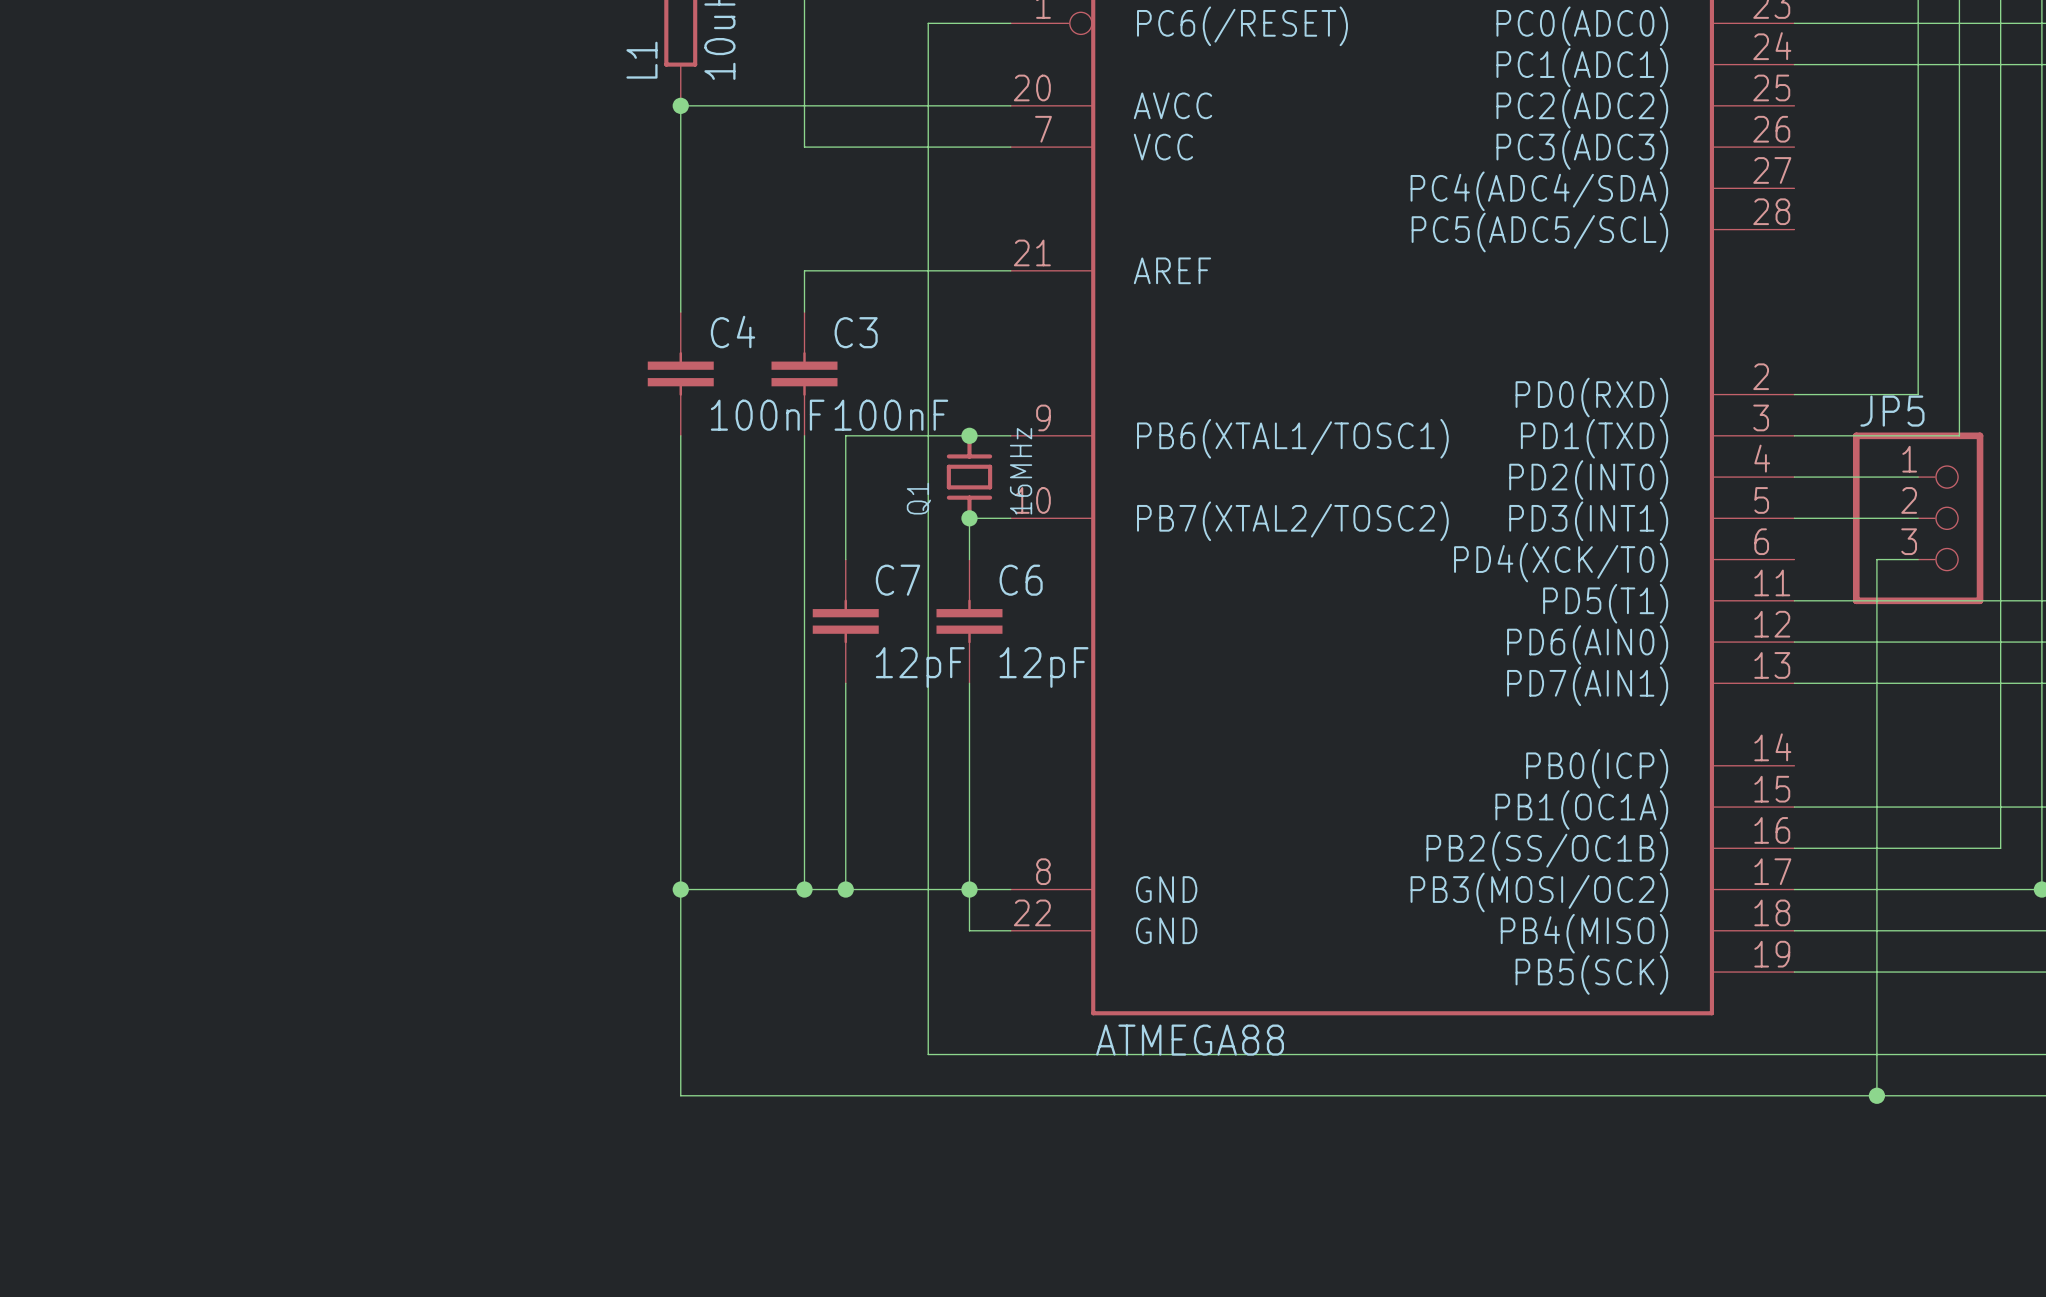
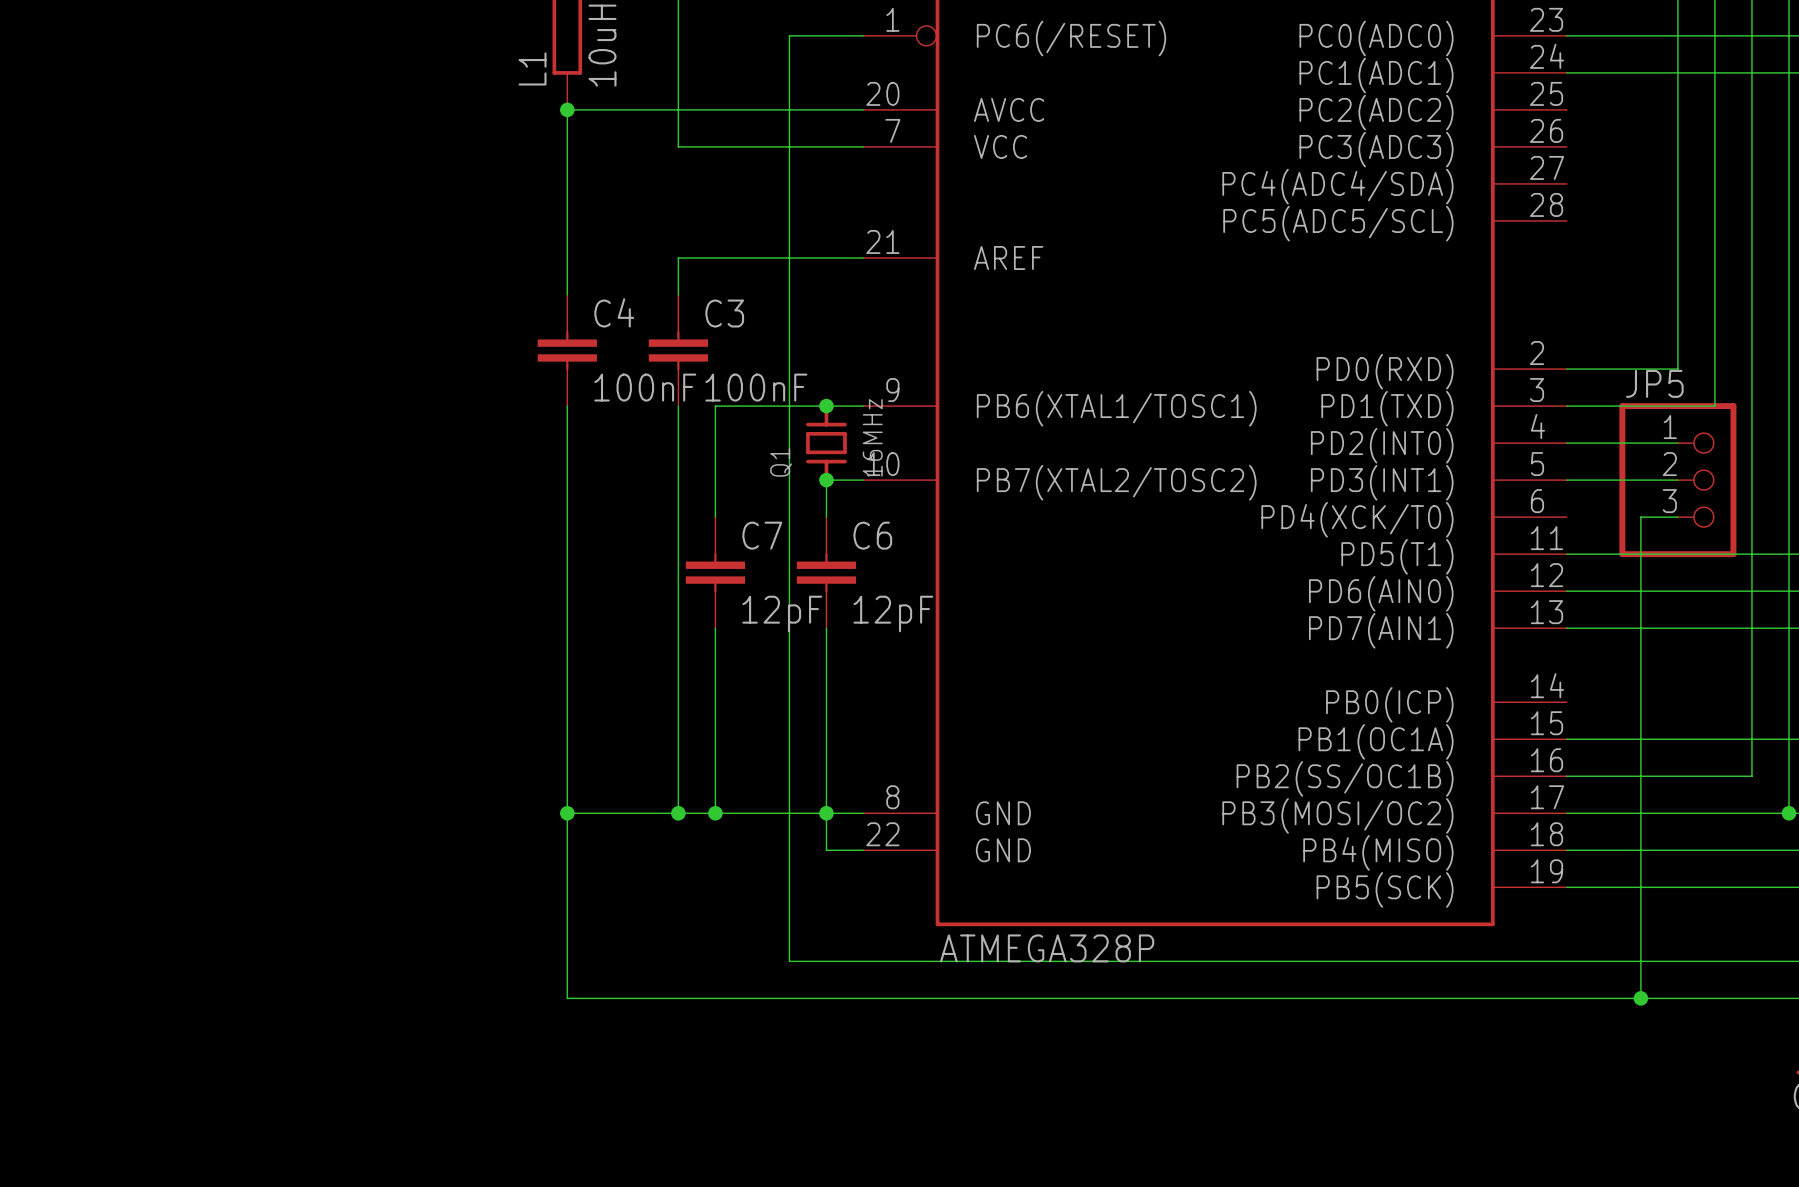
part value: ATMEGA88 (1190, 1040) -> ATMEGA328P (1047, 948)

